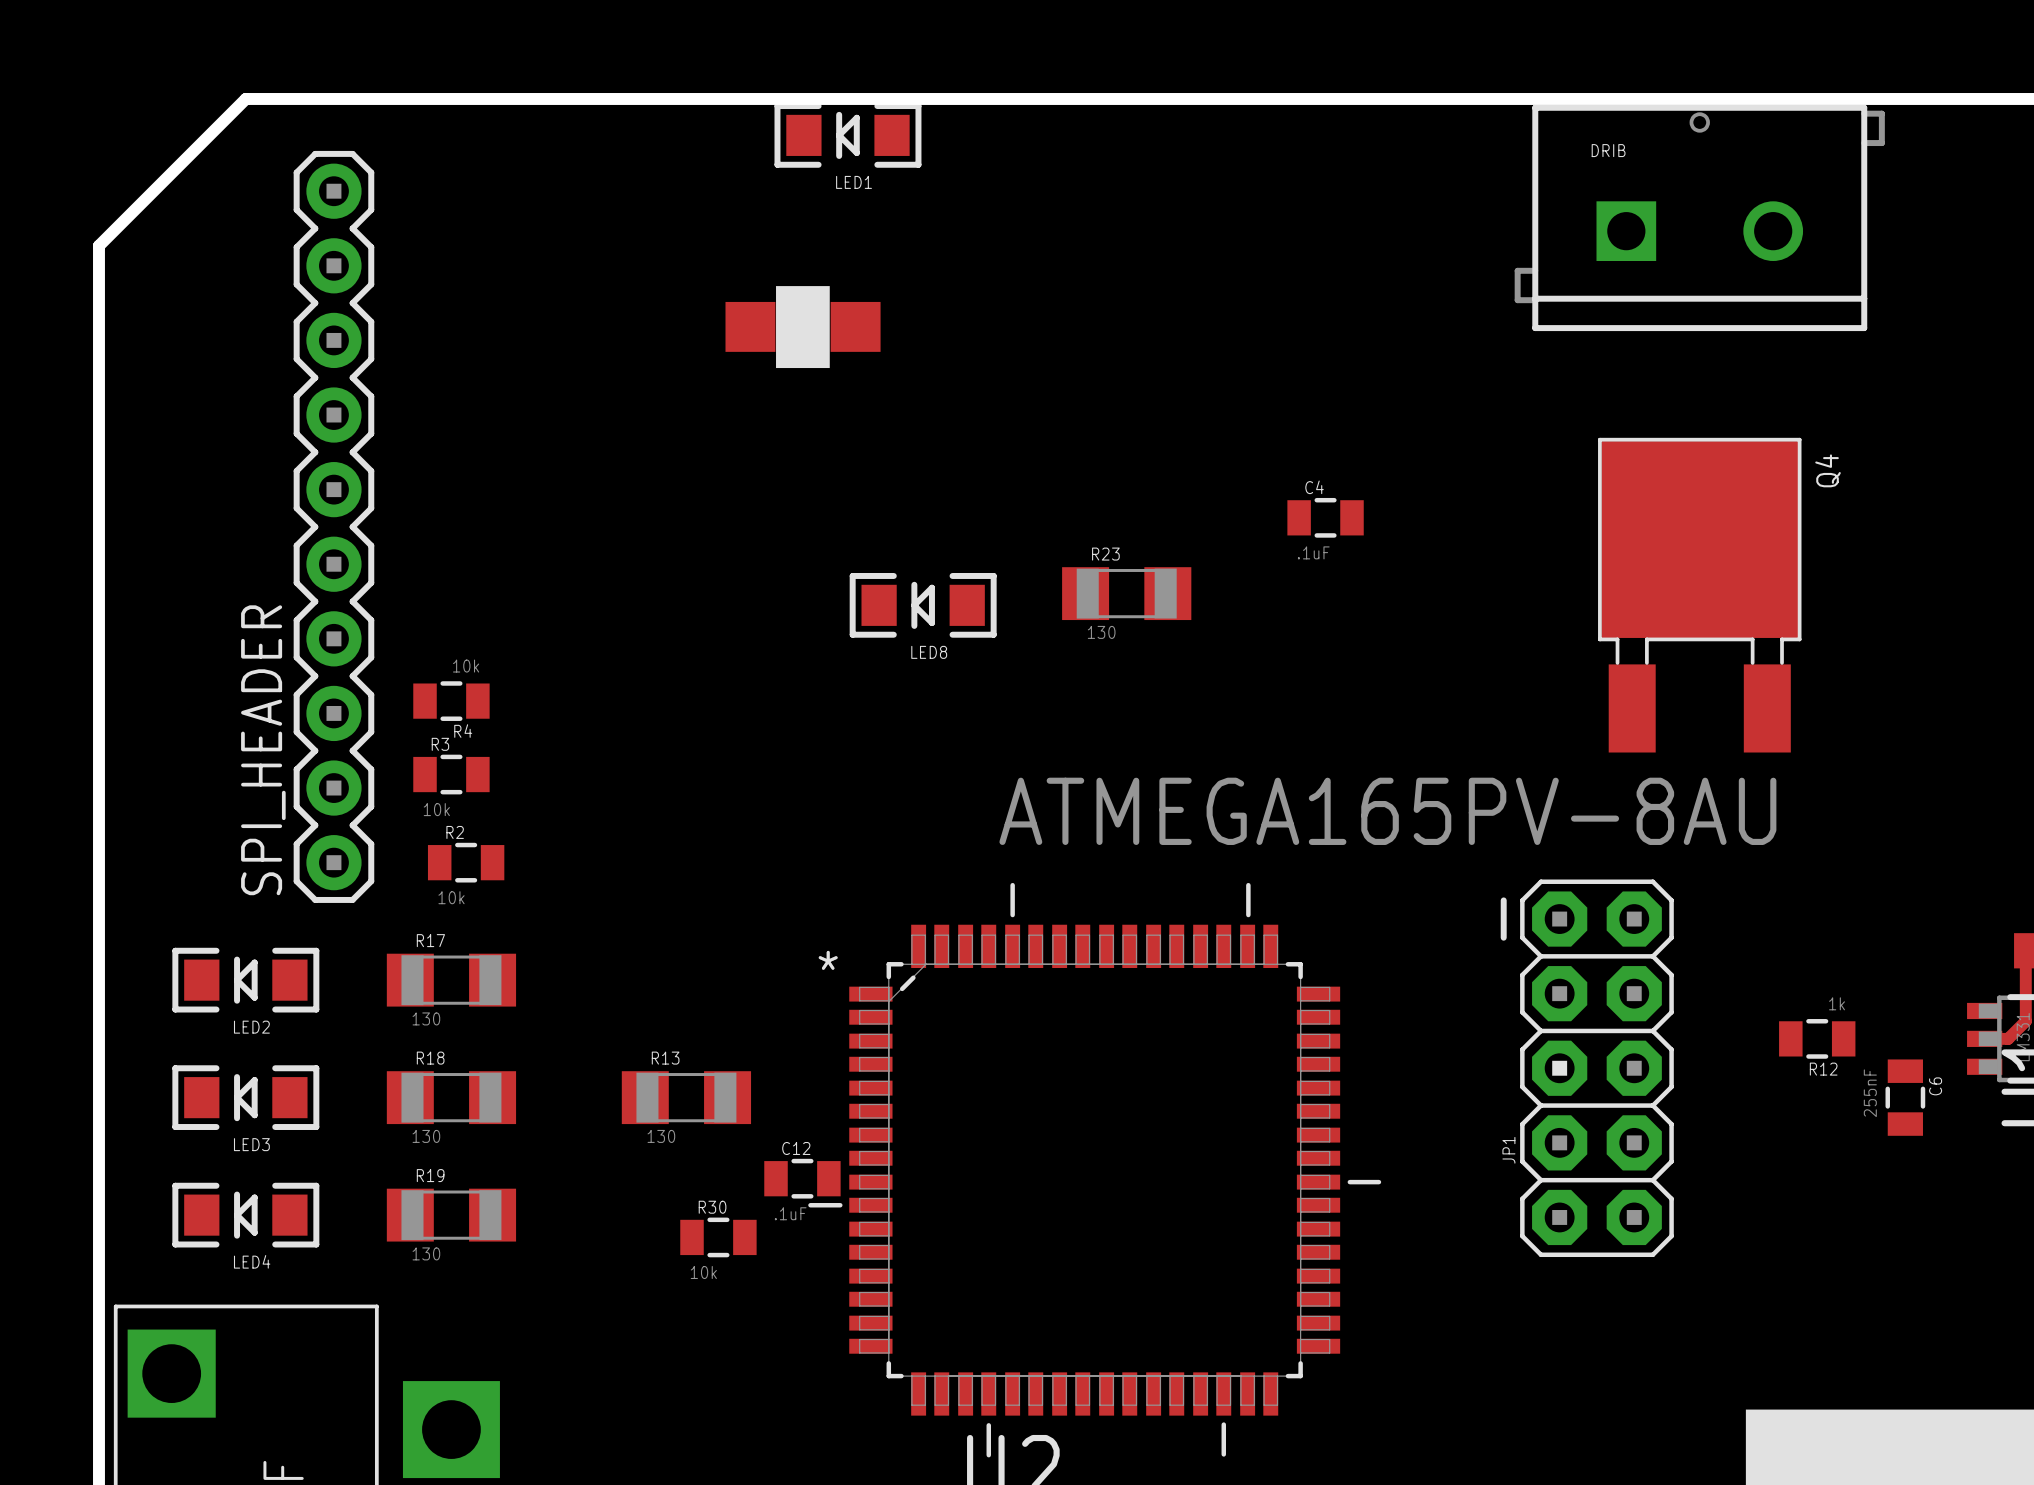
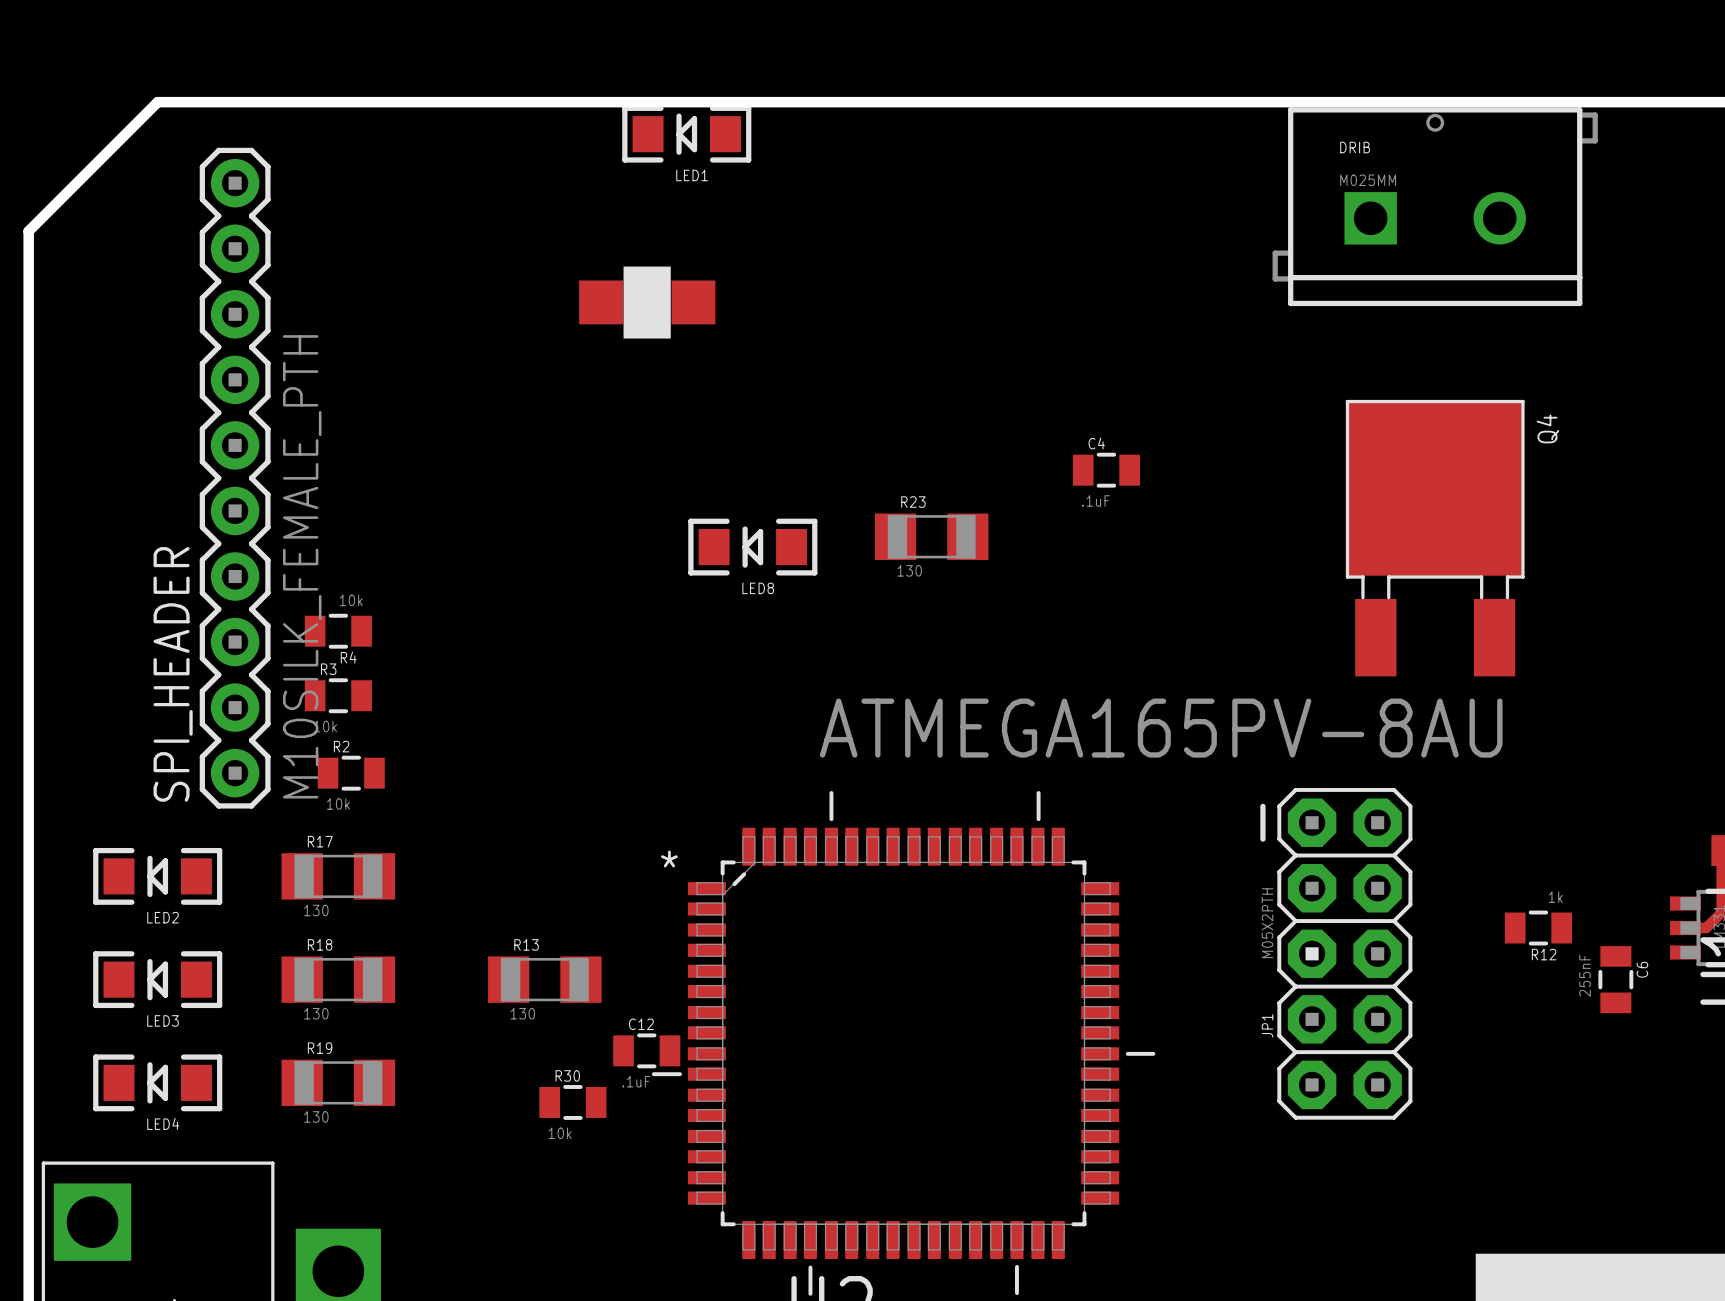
DRIB value: none -> M025MM (1368, 180)
SPI_HEADER value: none -> M10SILK_FEMALE_PTH (302, 566)
JP1 value: none -> M05X2PTH (1267, 923)

